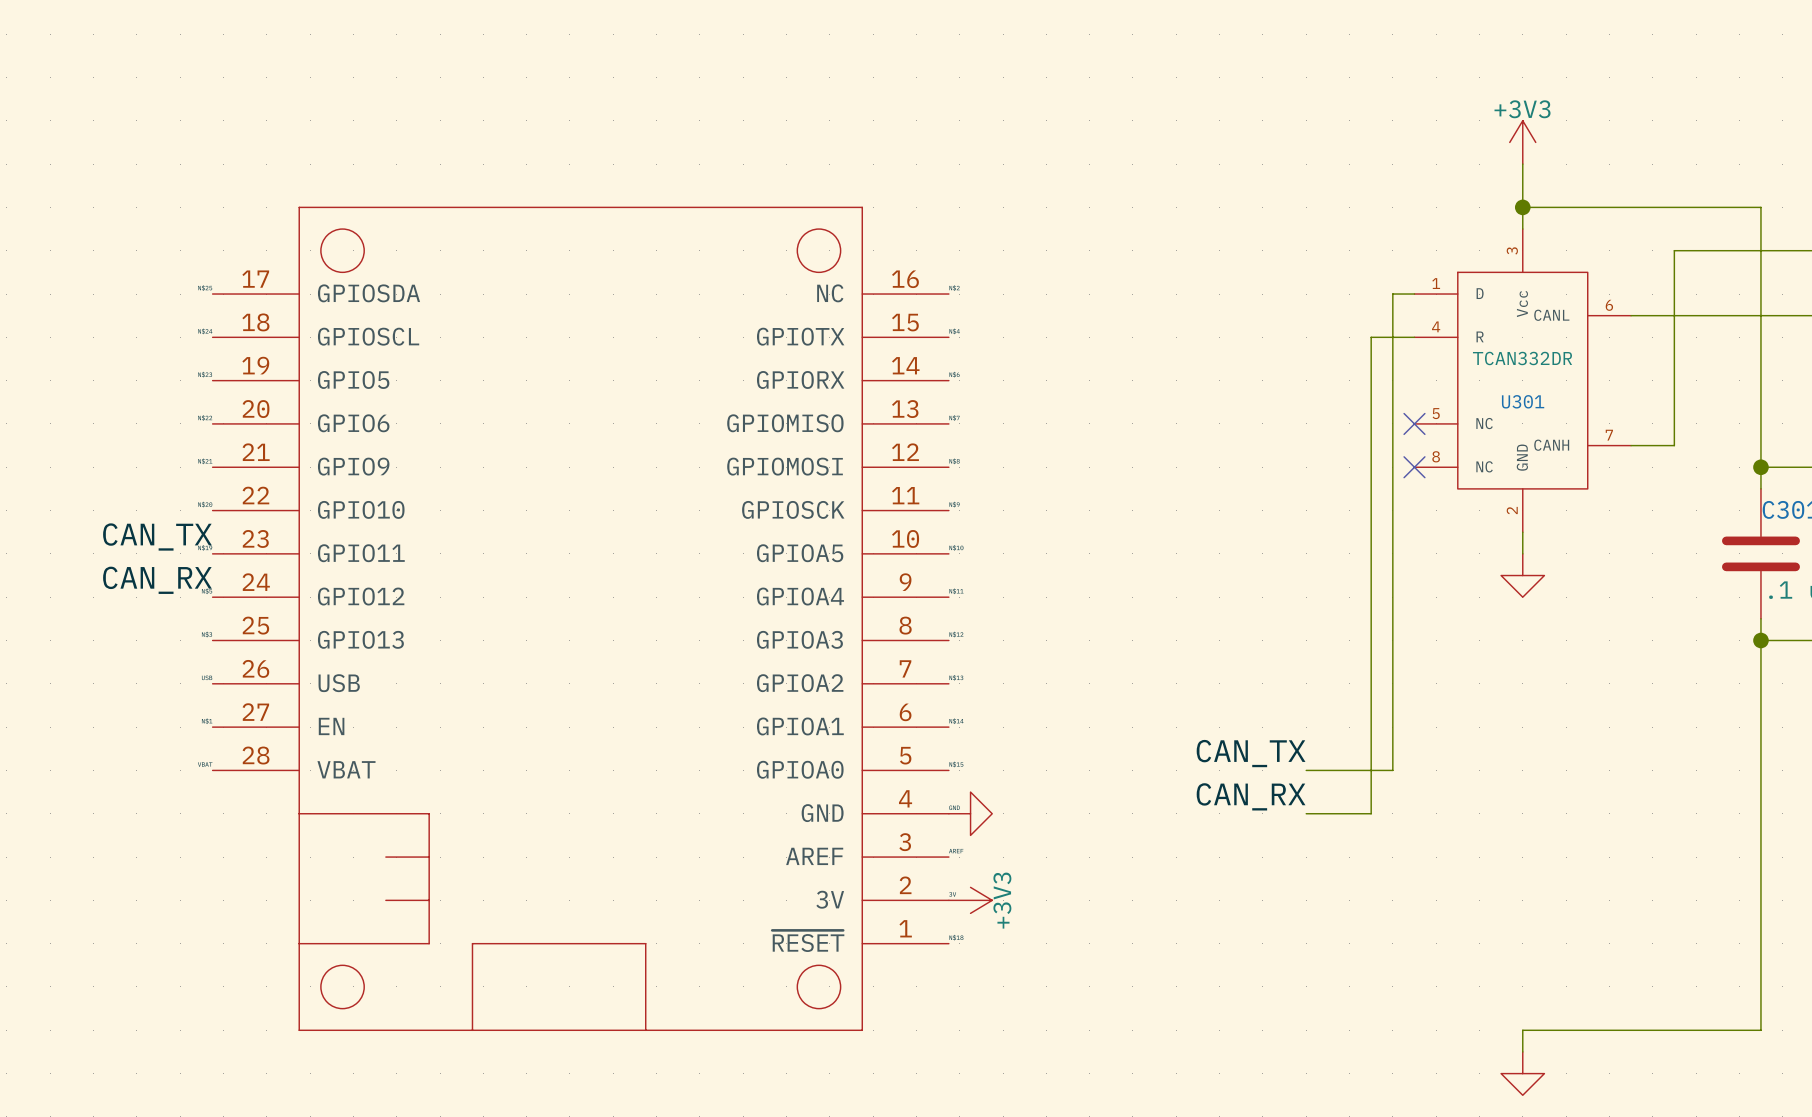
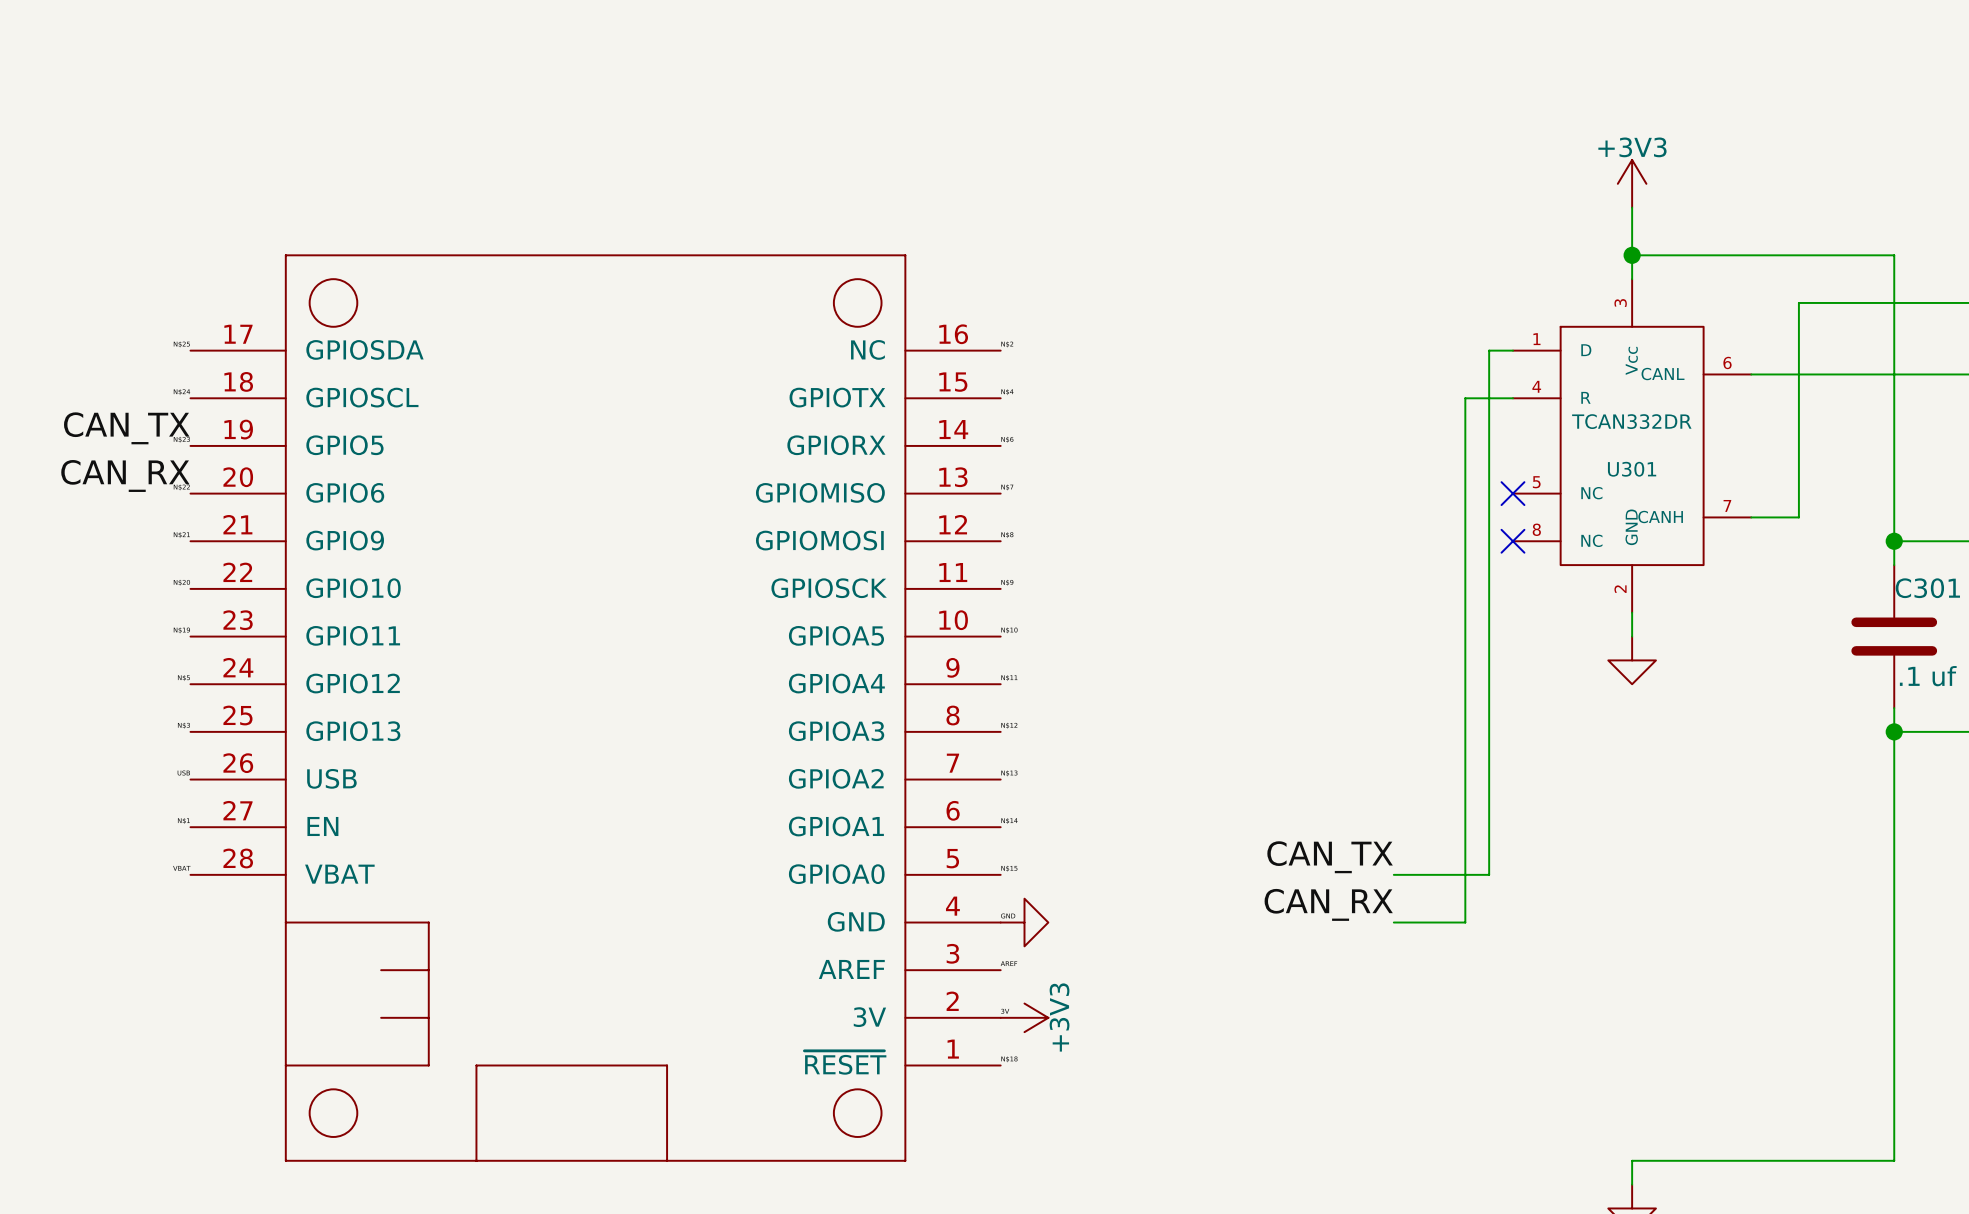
label position: CAN_TX (157, 536) -> CAN_TX (126, 428)
label position: CAN_RX (157, 580) -> CAN_RX (125, 475)

